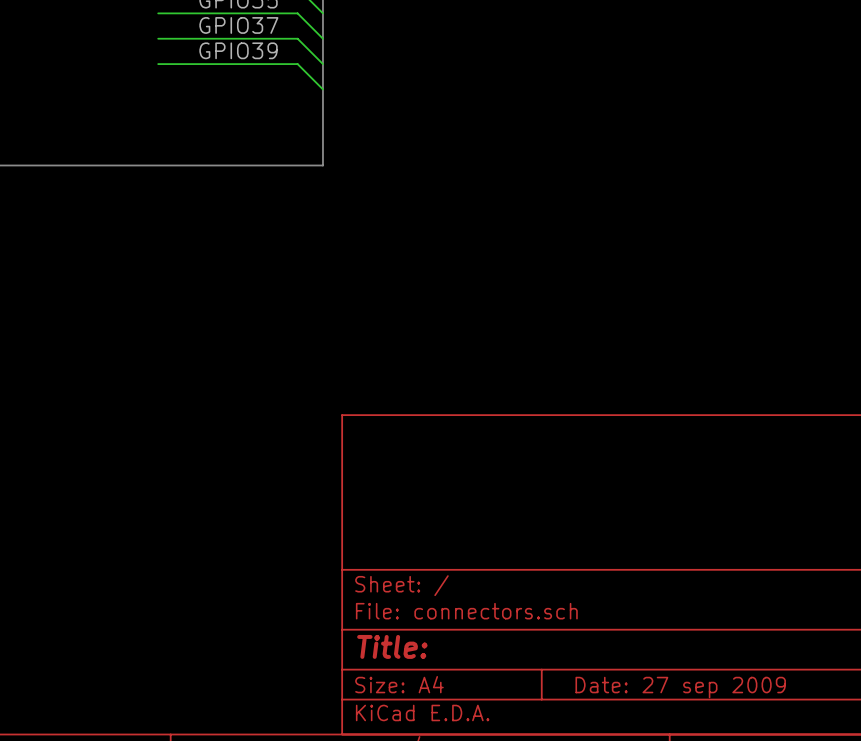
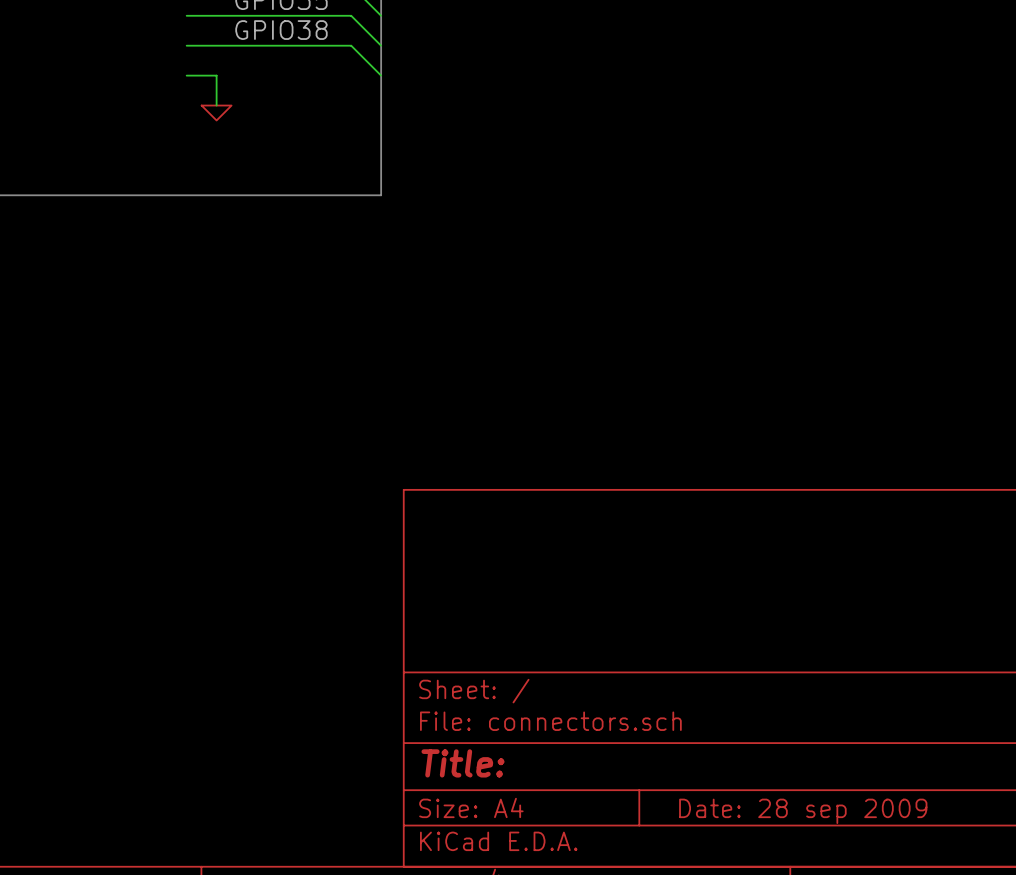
label: GPIO37 (238, 25) -> GPIO38 (281, 30)
label: GPIO39 (238, 50) -> none
wire: (183, 64) (297, 64) (322, 89) -> (216, 75) (216, 105)
power symbol: none -> (216, 113)
title block: Date: 27 sep 2009 (680, 687) -> Date: 28 sep 2009 (803, 811)

